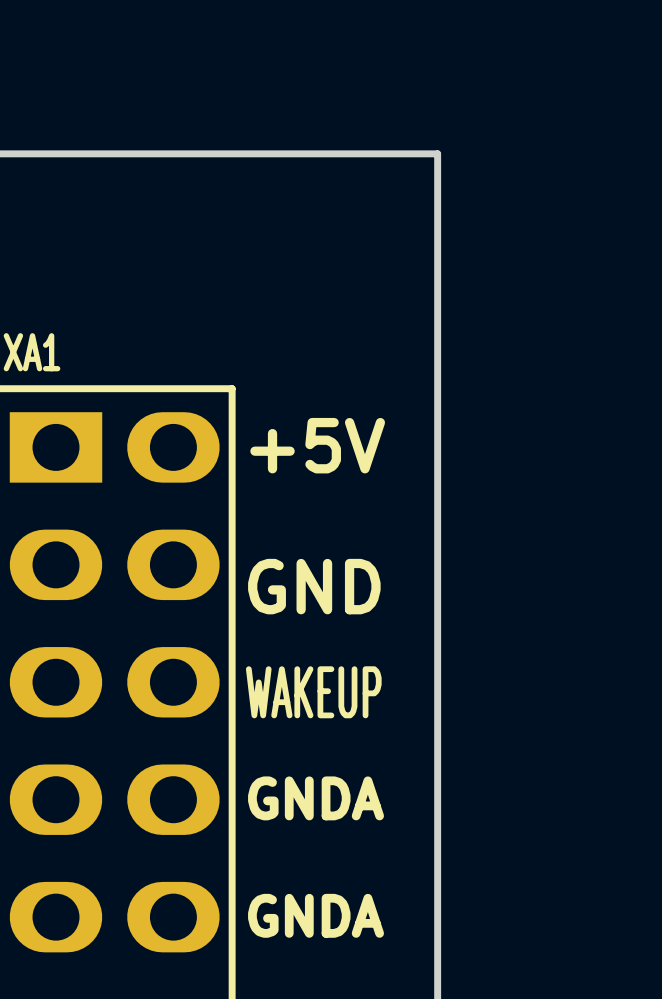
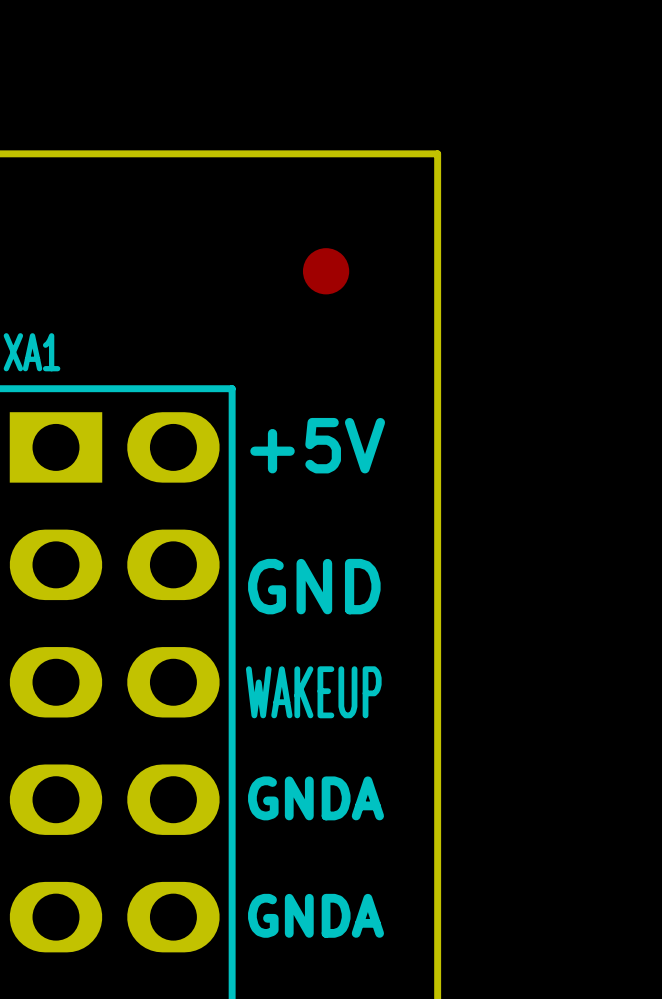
part: none -> (326, 271)

